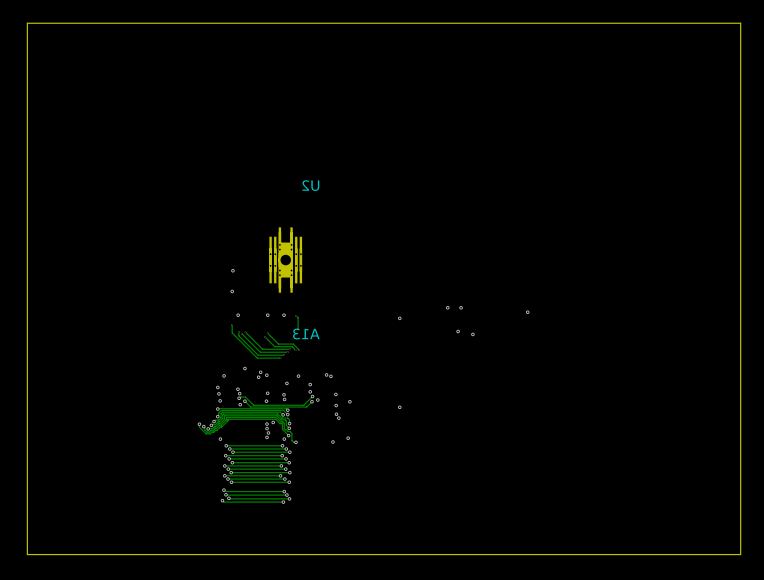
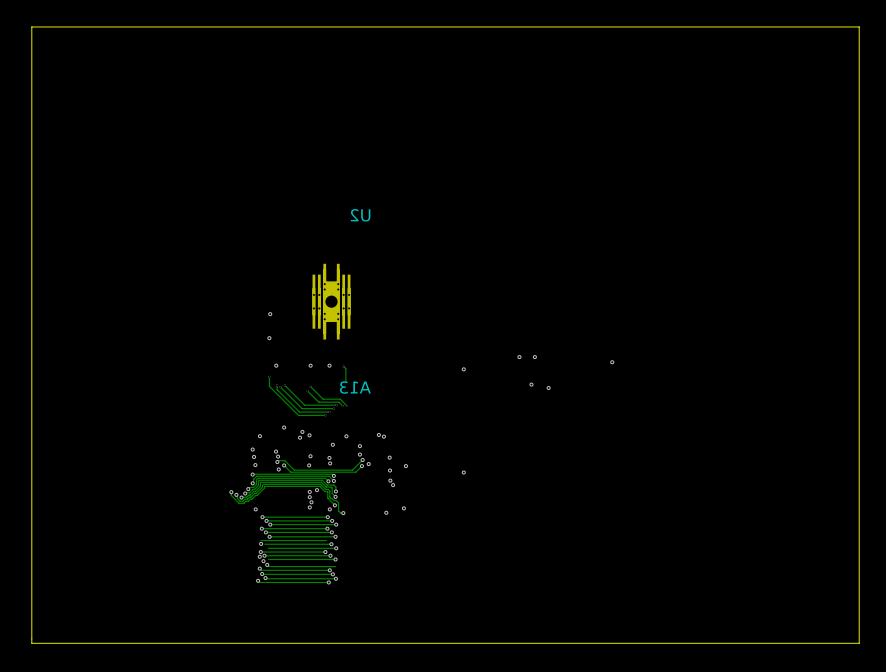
via: (224, 465) -> none
via: (281, 465) -> none
via: none -> (261, 543)
via: (228, 469) -> none
via: (231, 472) -> none
via: none -> (259, 556)
via: (231, 482) -> none
via: none -> (263, 561)
track: none -> (267, 564) (268, 566) (335, 566)
via: none -> (267, 564)

